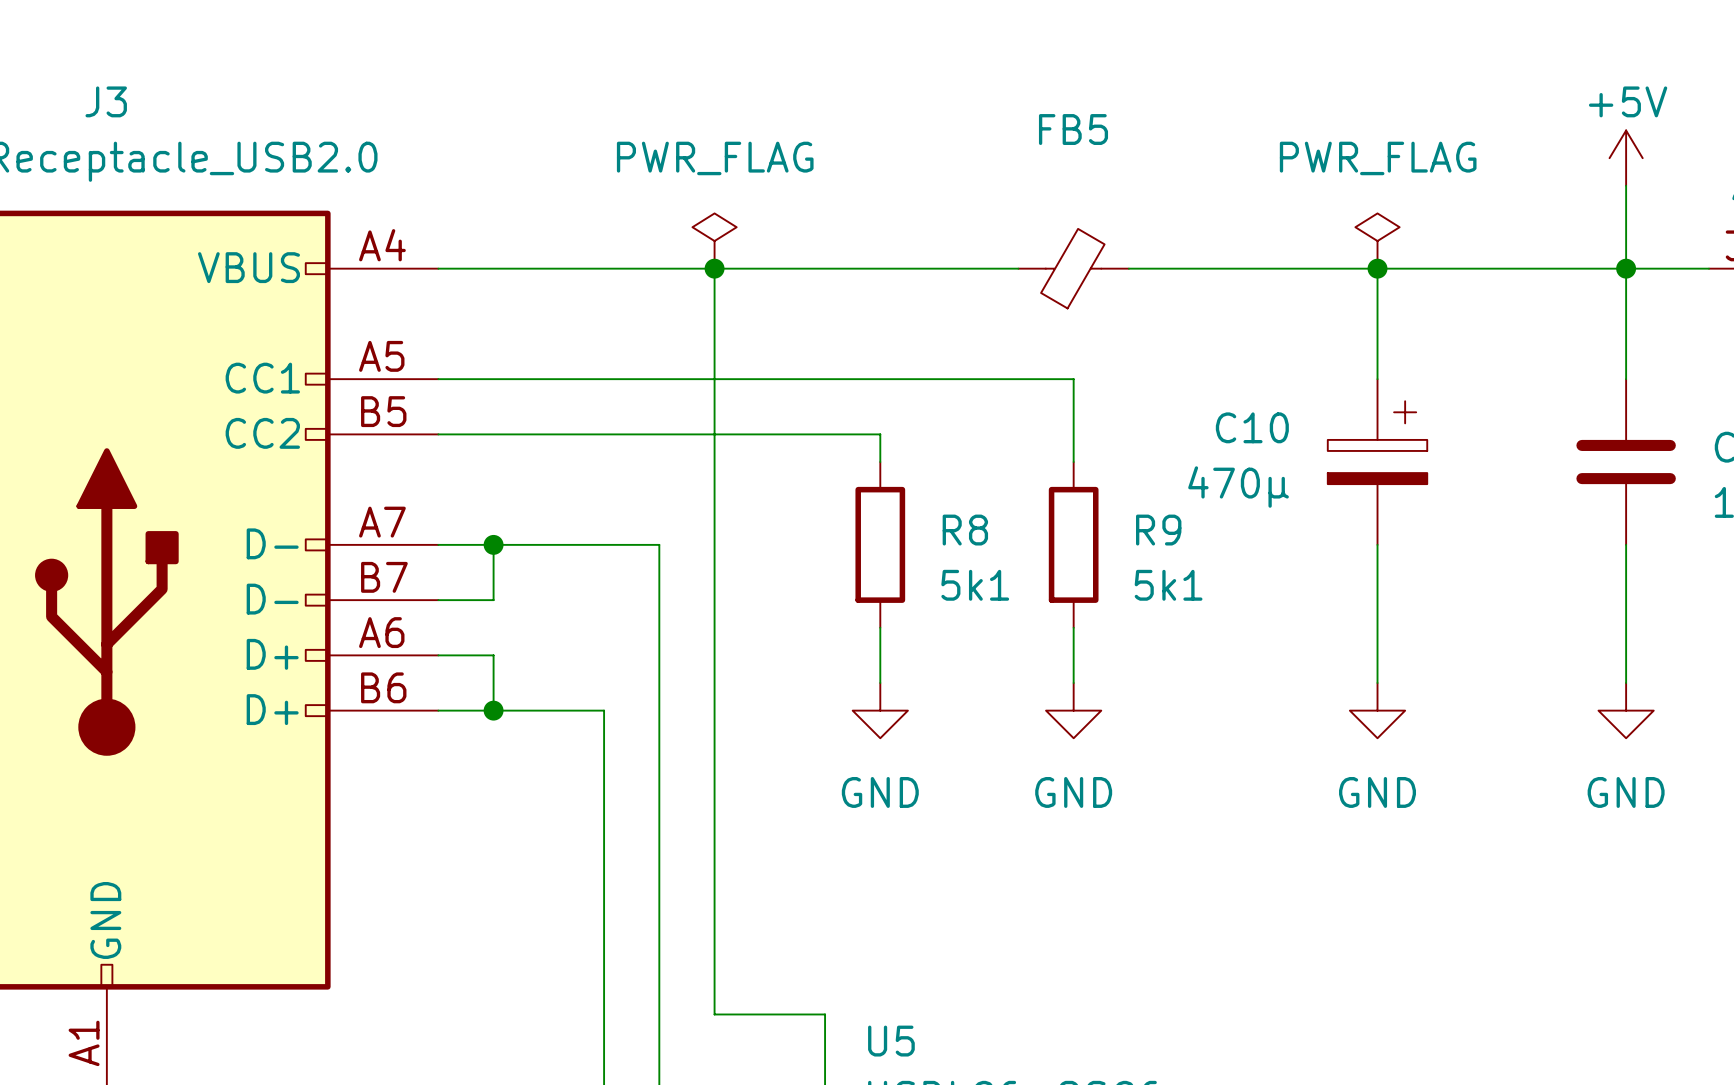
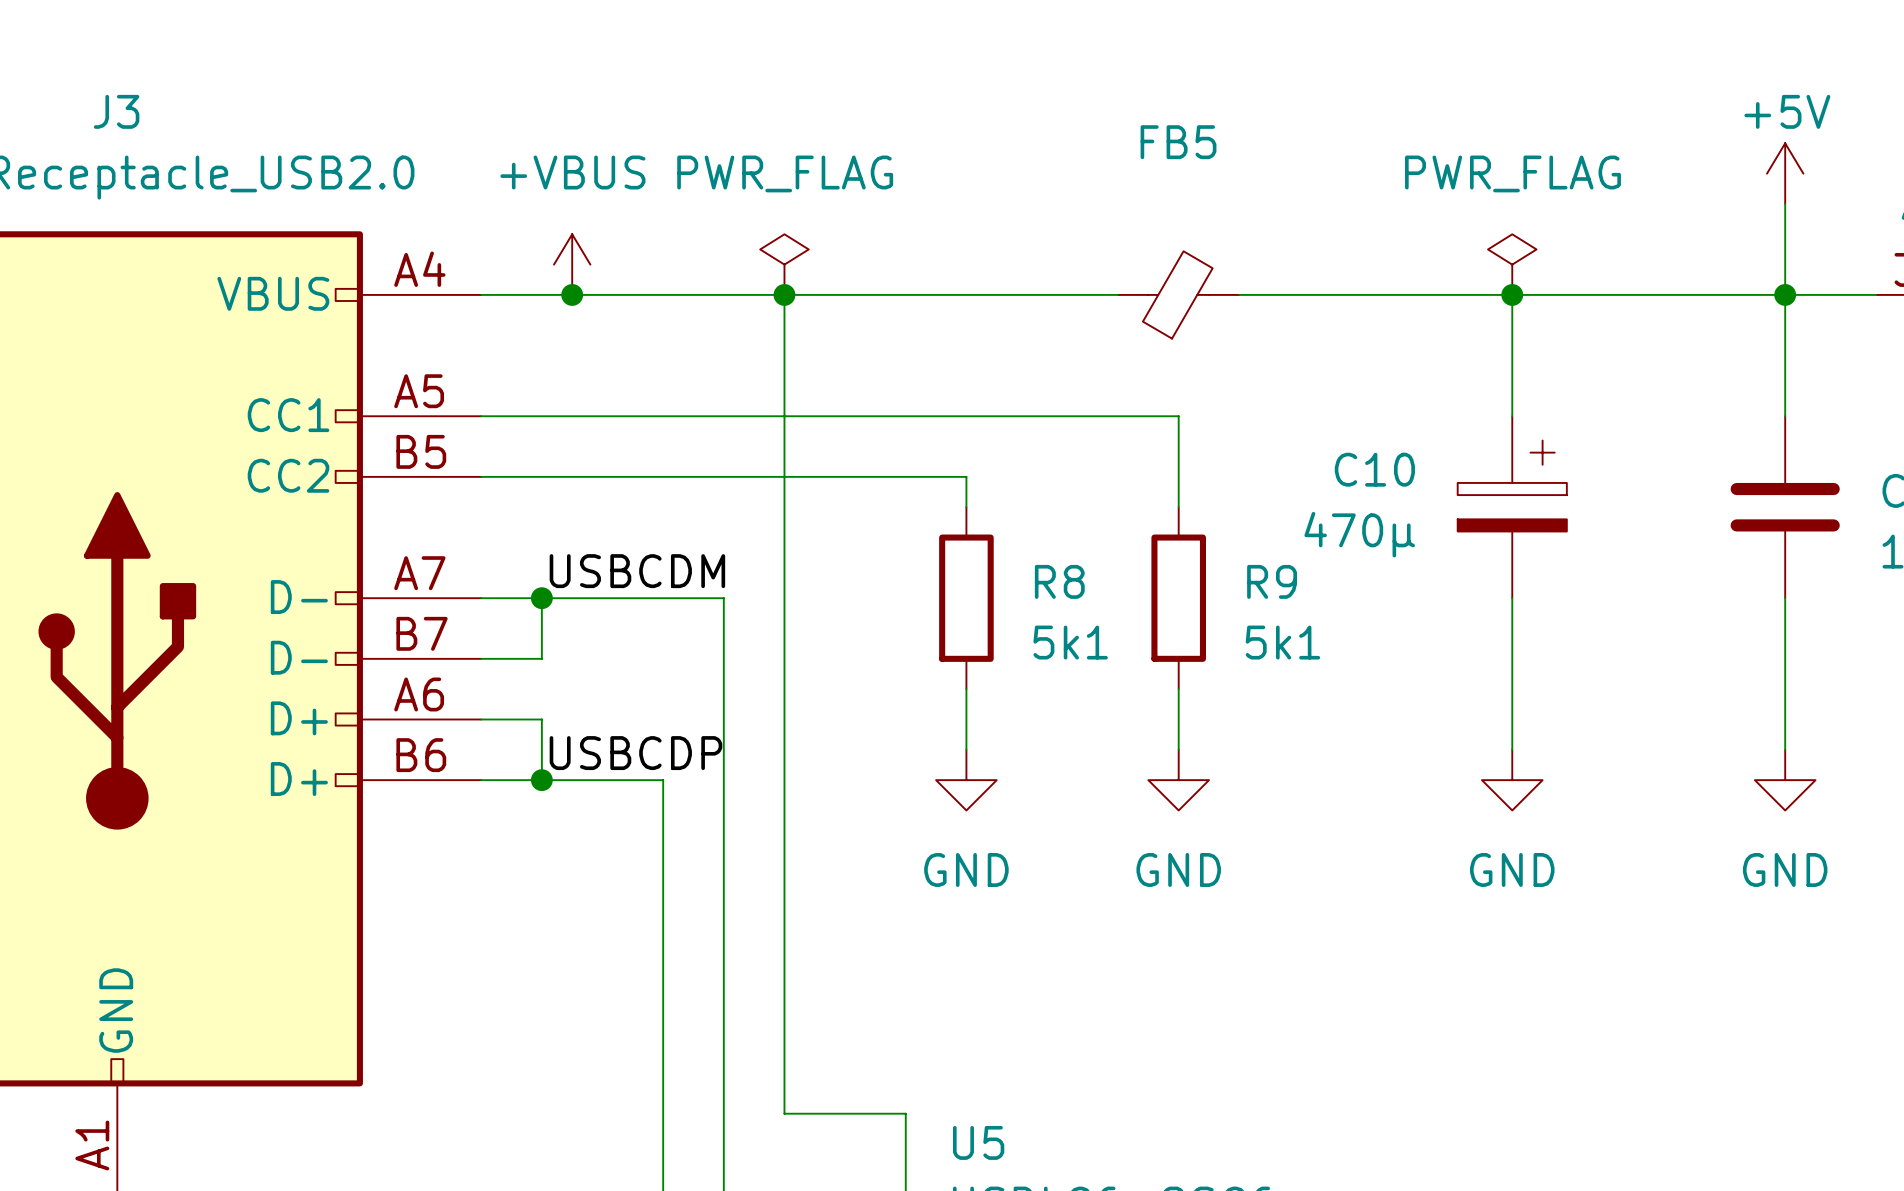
power symbol: none -> +VBUS (572, 264)
junction: none -> (572, 294)
label: none -> USBCDM (637, 571)
label: none -> USBCDP (635, 753)

